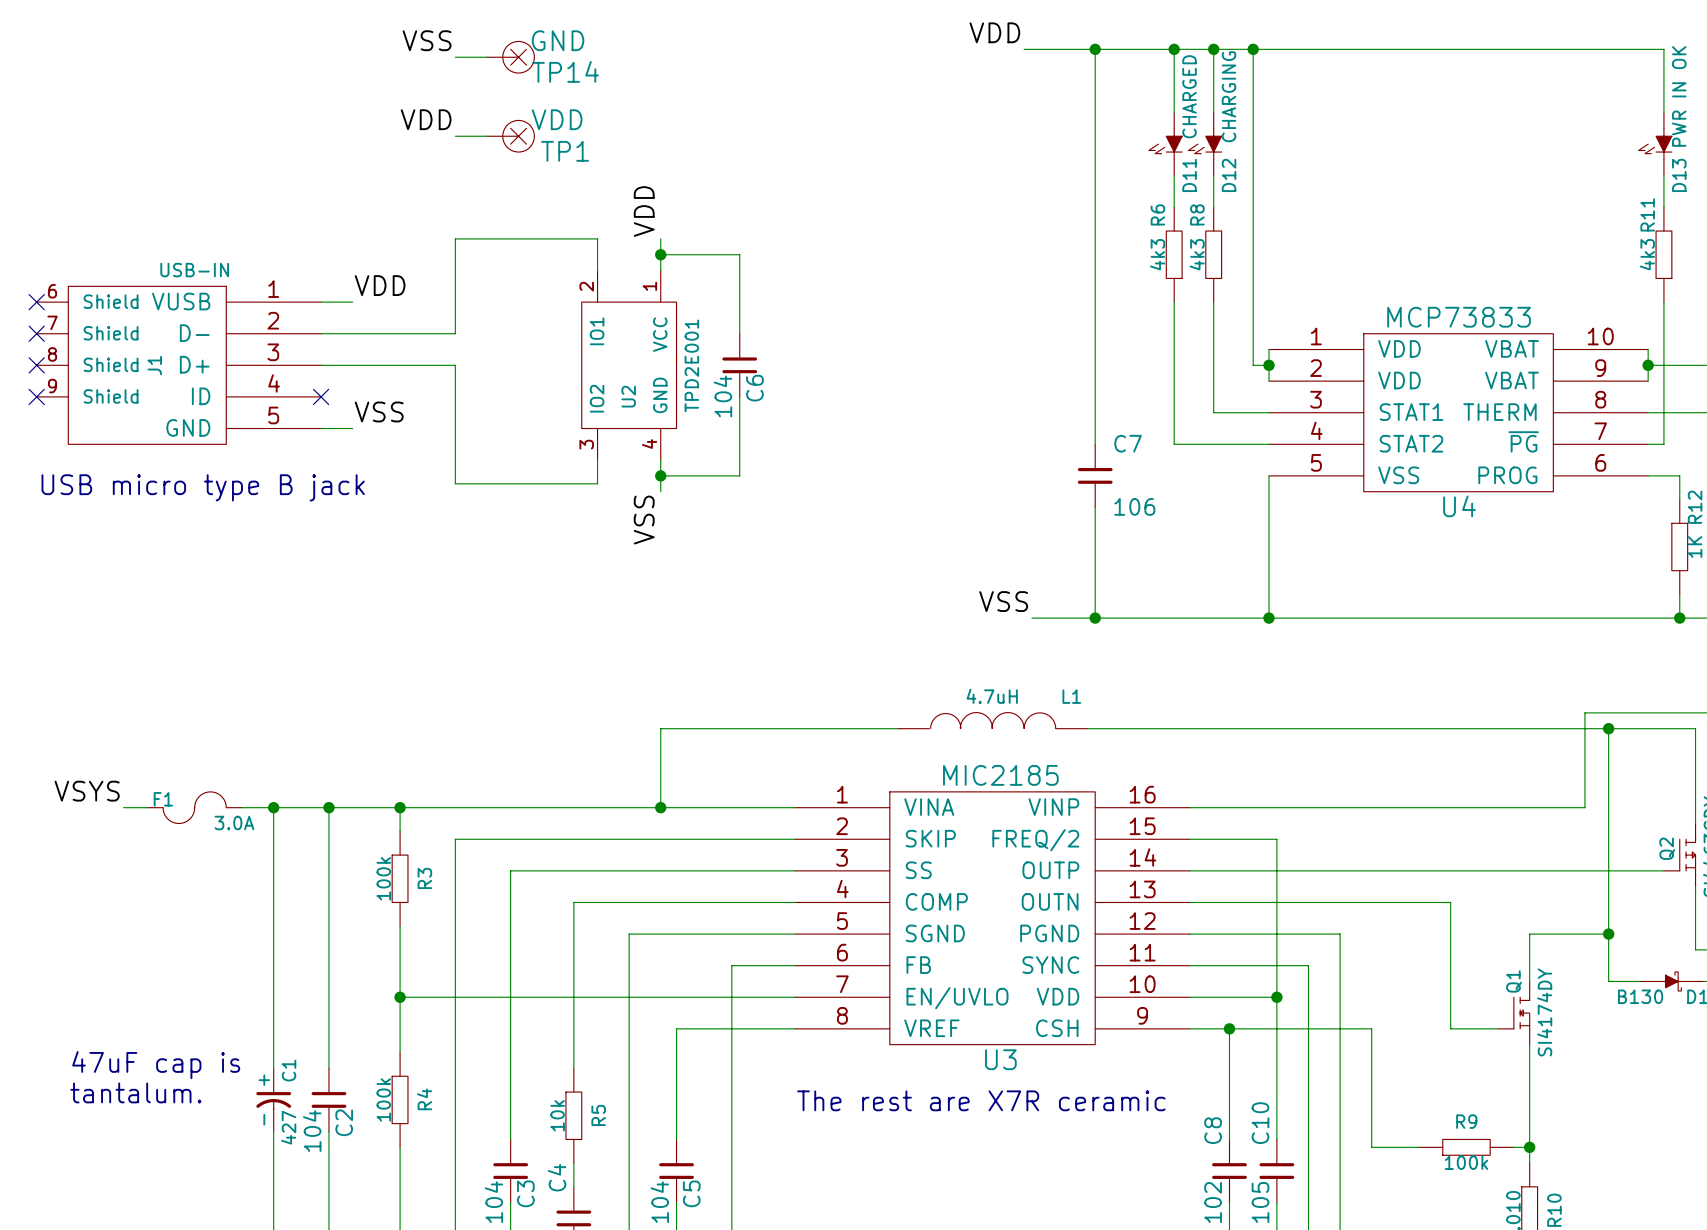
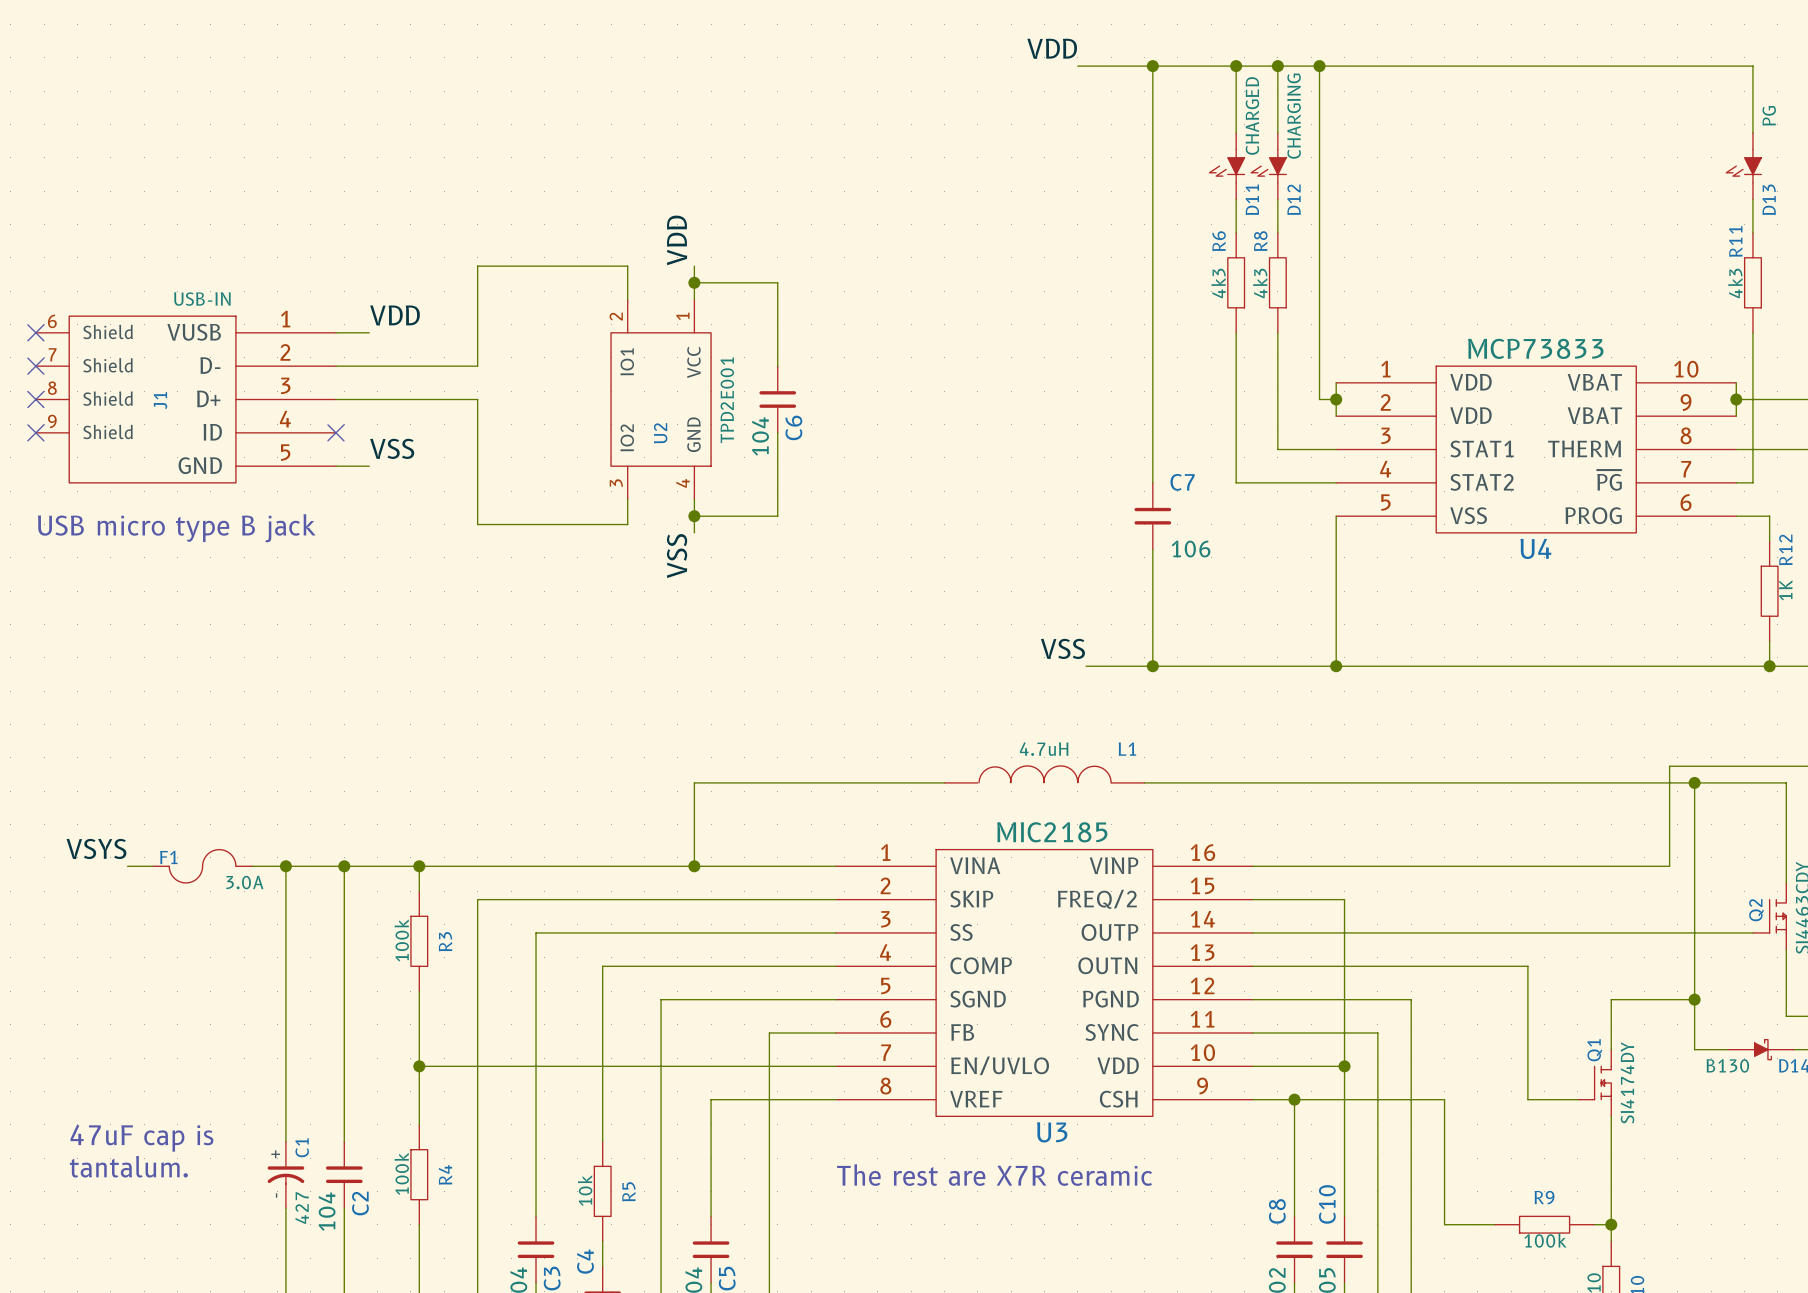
label: VSS (427, 40) -> none
wire: (455, 57) (486, 57) -> none
TP14: GND (510, 57) -> none
D13 value: PWR IN OK (1679, 96) -> PG (1769, 115)
label: VDD (426, 119) -> none
wire: (455, 136) (486, 136) -> none
TP1: VDD (510, 136) -> none

